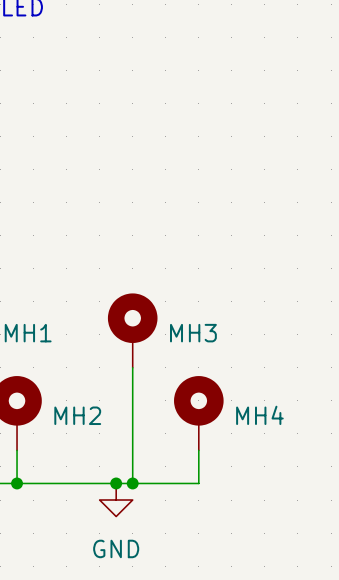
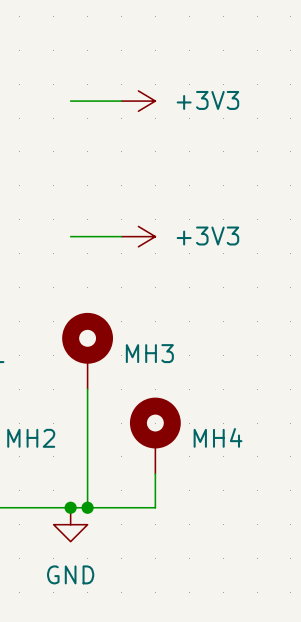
wire: none -> (70, 101) (121, 101)
power symbol: none -> +3V3 (138, 101)
wire: none -> (70, 236) (121, 236)
power symbol: none -> +3V3 (138, 236)

